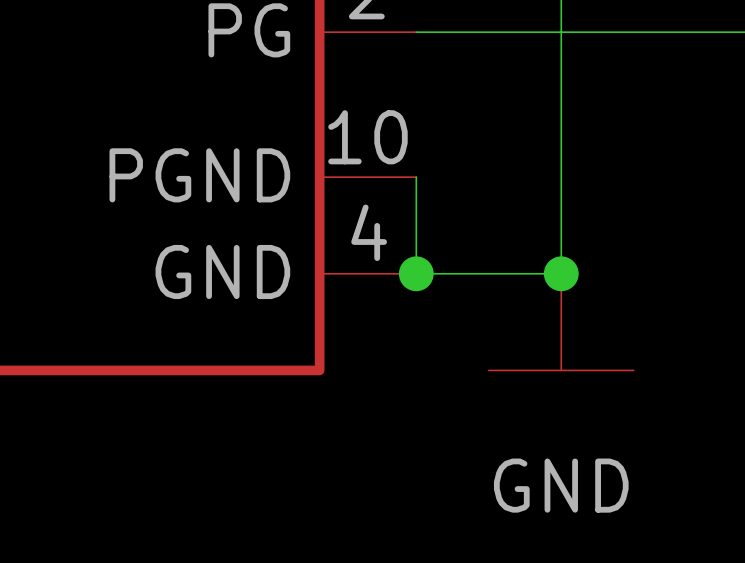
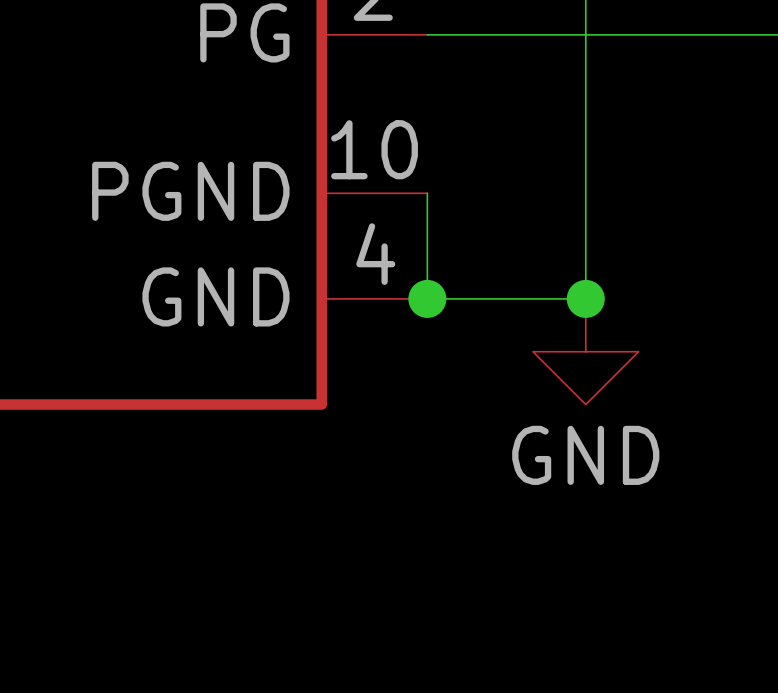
power symbol shape: [488, 273, 634, 371] -> [532, 298, 639, 405]

